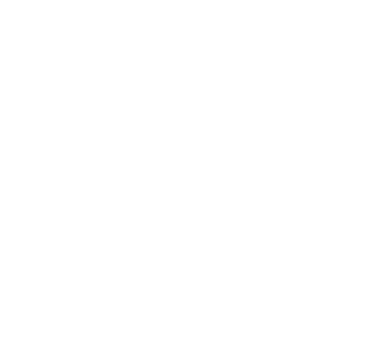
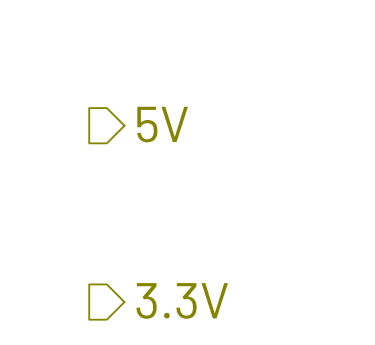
hierarchical label: none -> 5V (162, 124)
hierarchical label: none -> 3.3V (182, 300)

